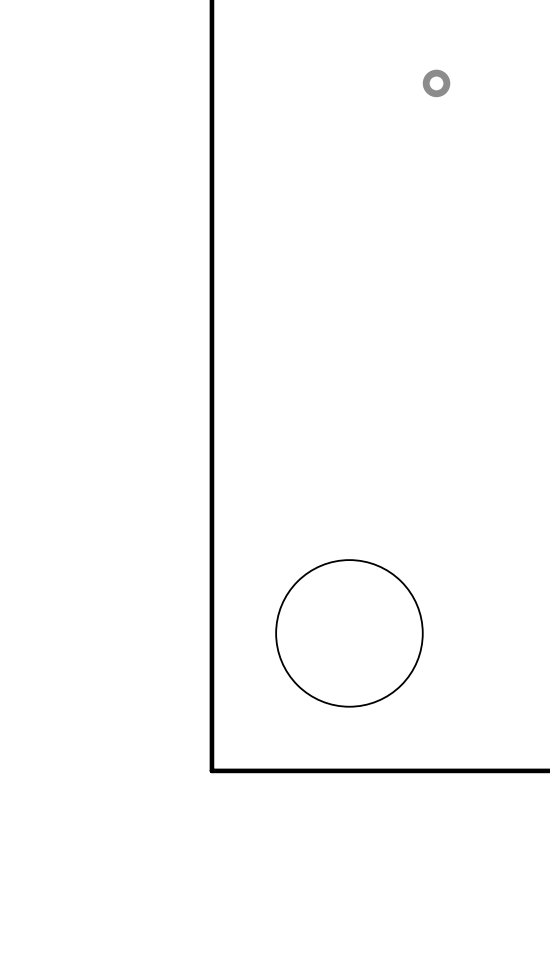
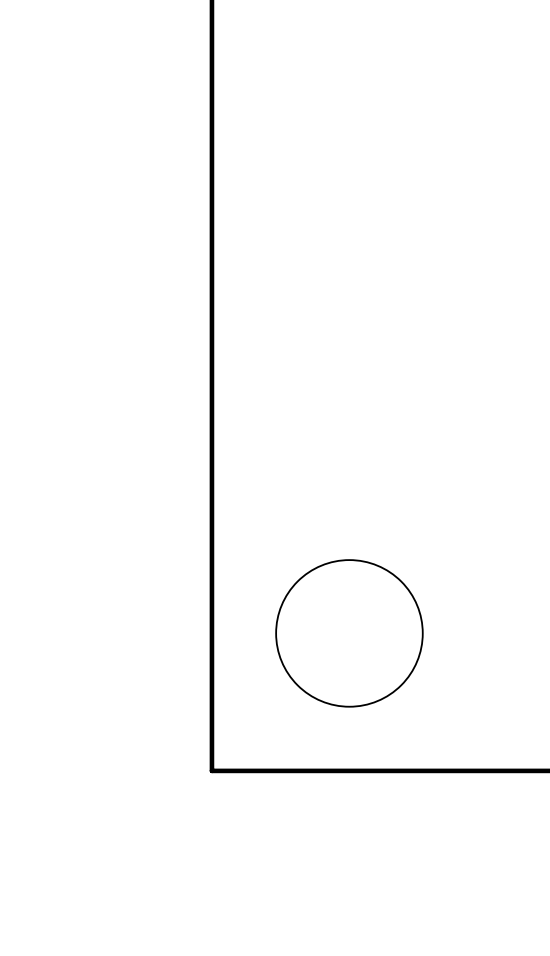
via: (436, 83) -> none

